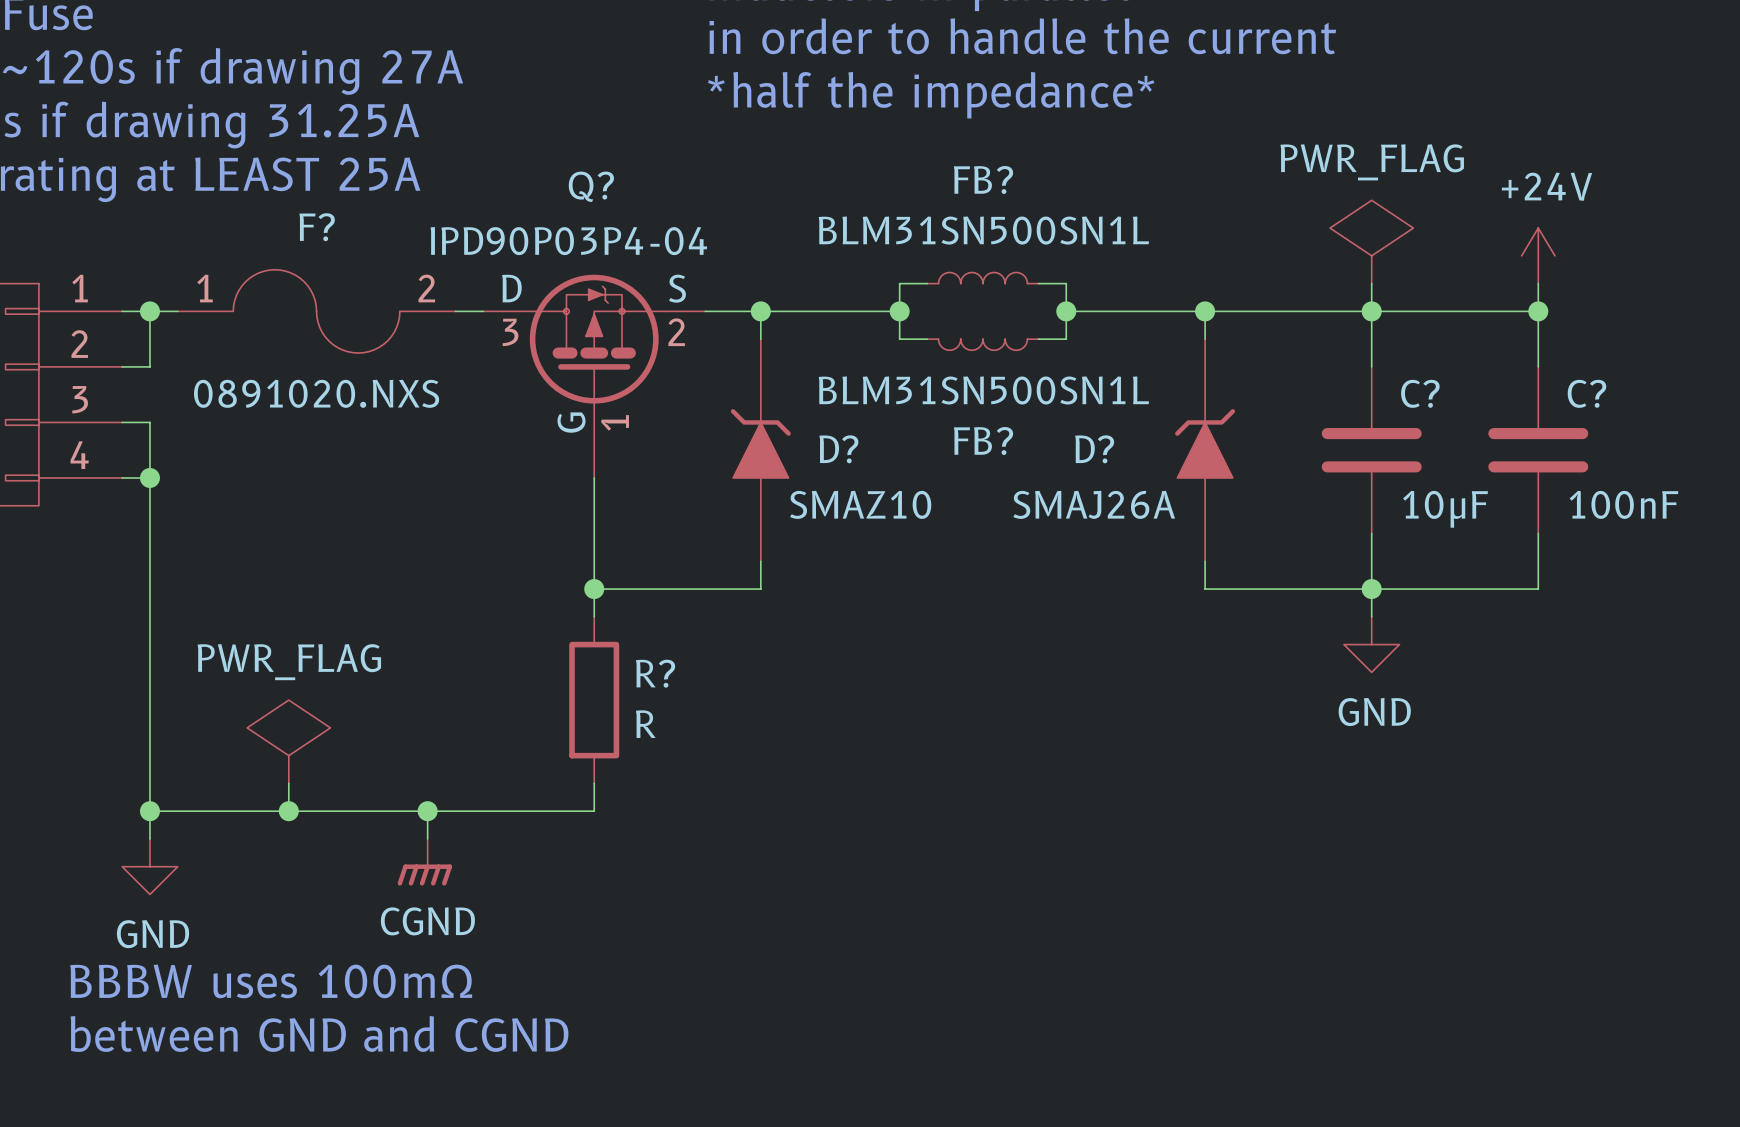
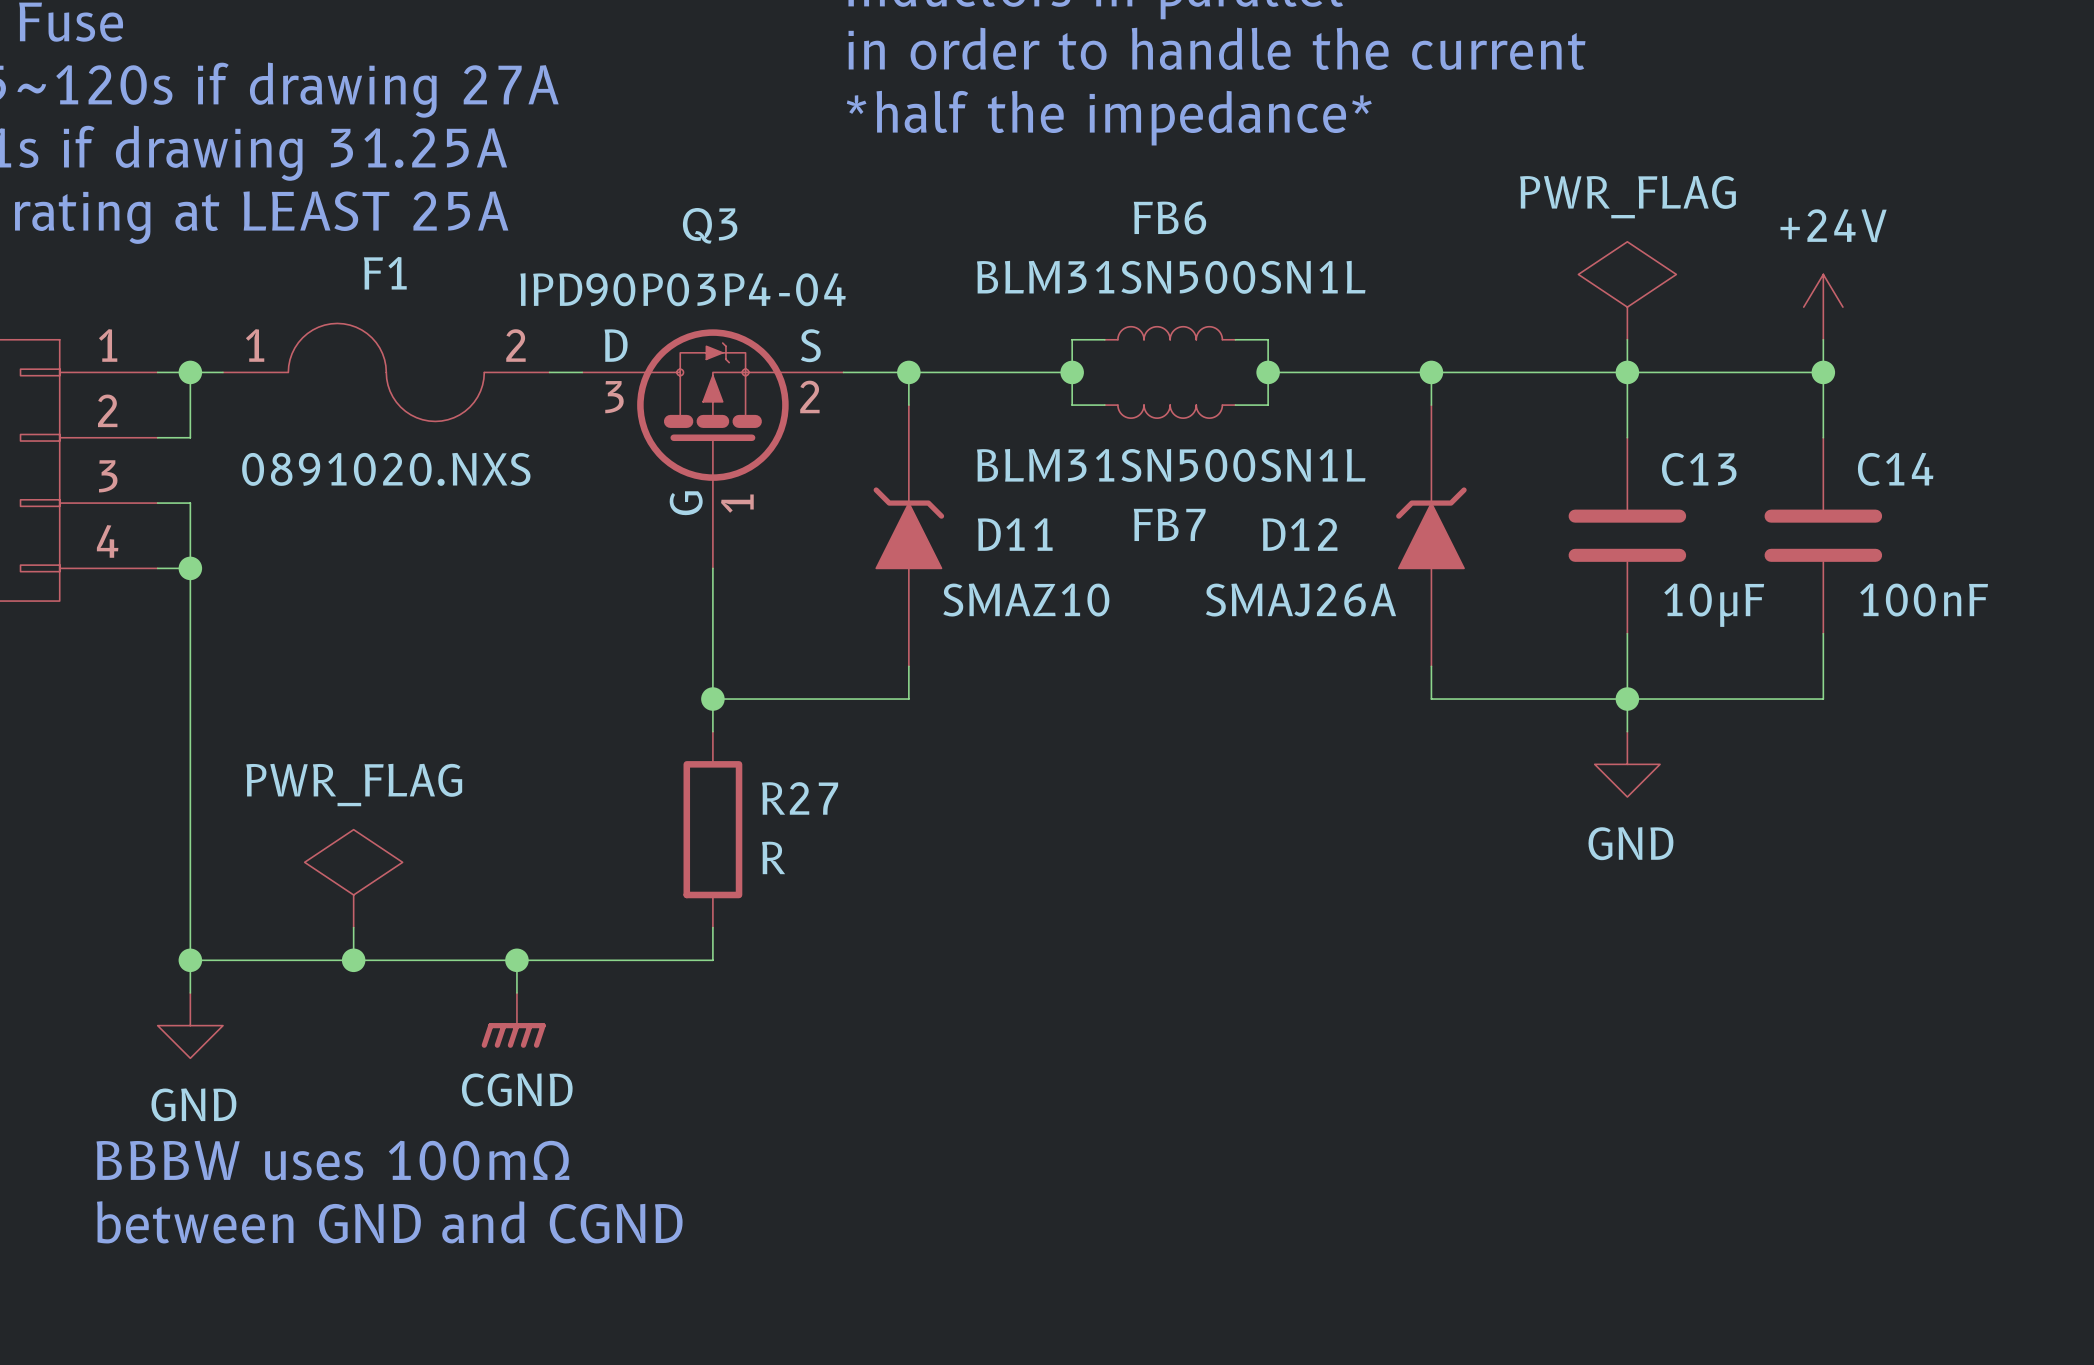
FB? name: FB? (983, 180) -> FB6 (1170, 217)
Q? name: Q? (591, 186) -> Q3 (710, 225)
F? name: F? (317, 227) -> F1 (385, 273)
C? name: C? (1420, 393) -> C13 (1699, 469)
C? name: C? (1586, 393) -> C14 (1895, 469)
FB? name: FB? (983, 441) -> FB7 (1169, 524)
D? name: D? (838, 449) -> D11 (1015, 534)
D? name: D? (1094, 449) -> D12 (1299, 534)
R? name: R? (655, 673) -> R27 (800, 798)

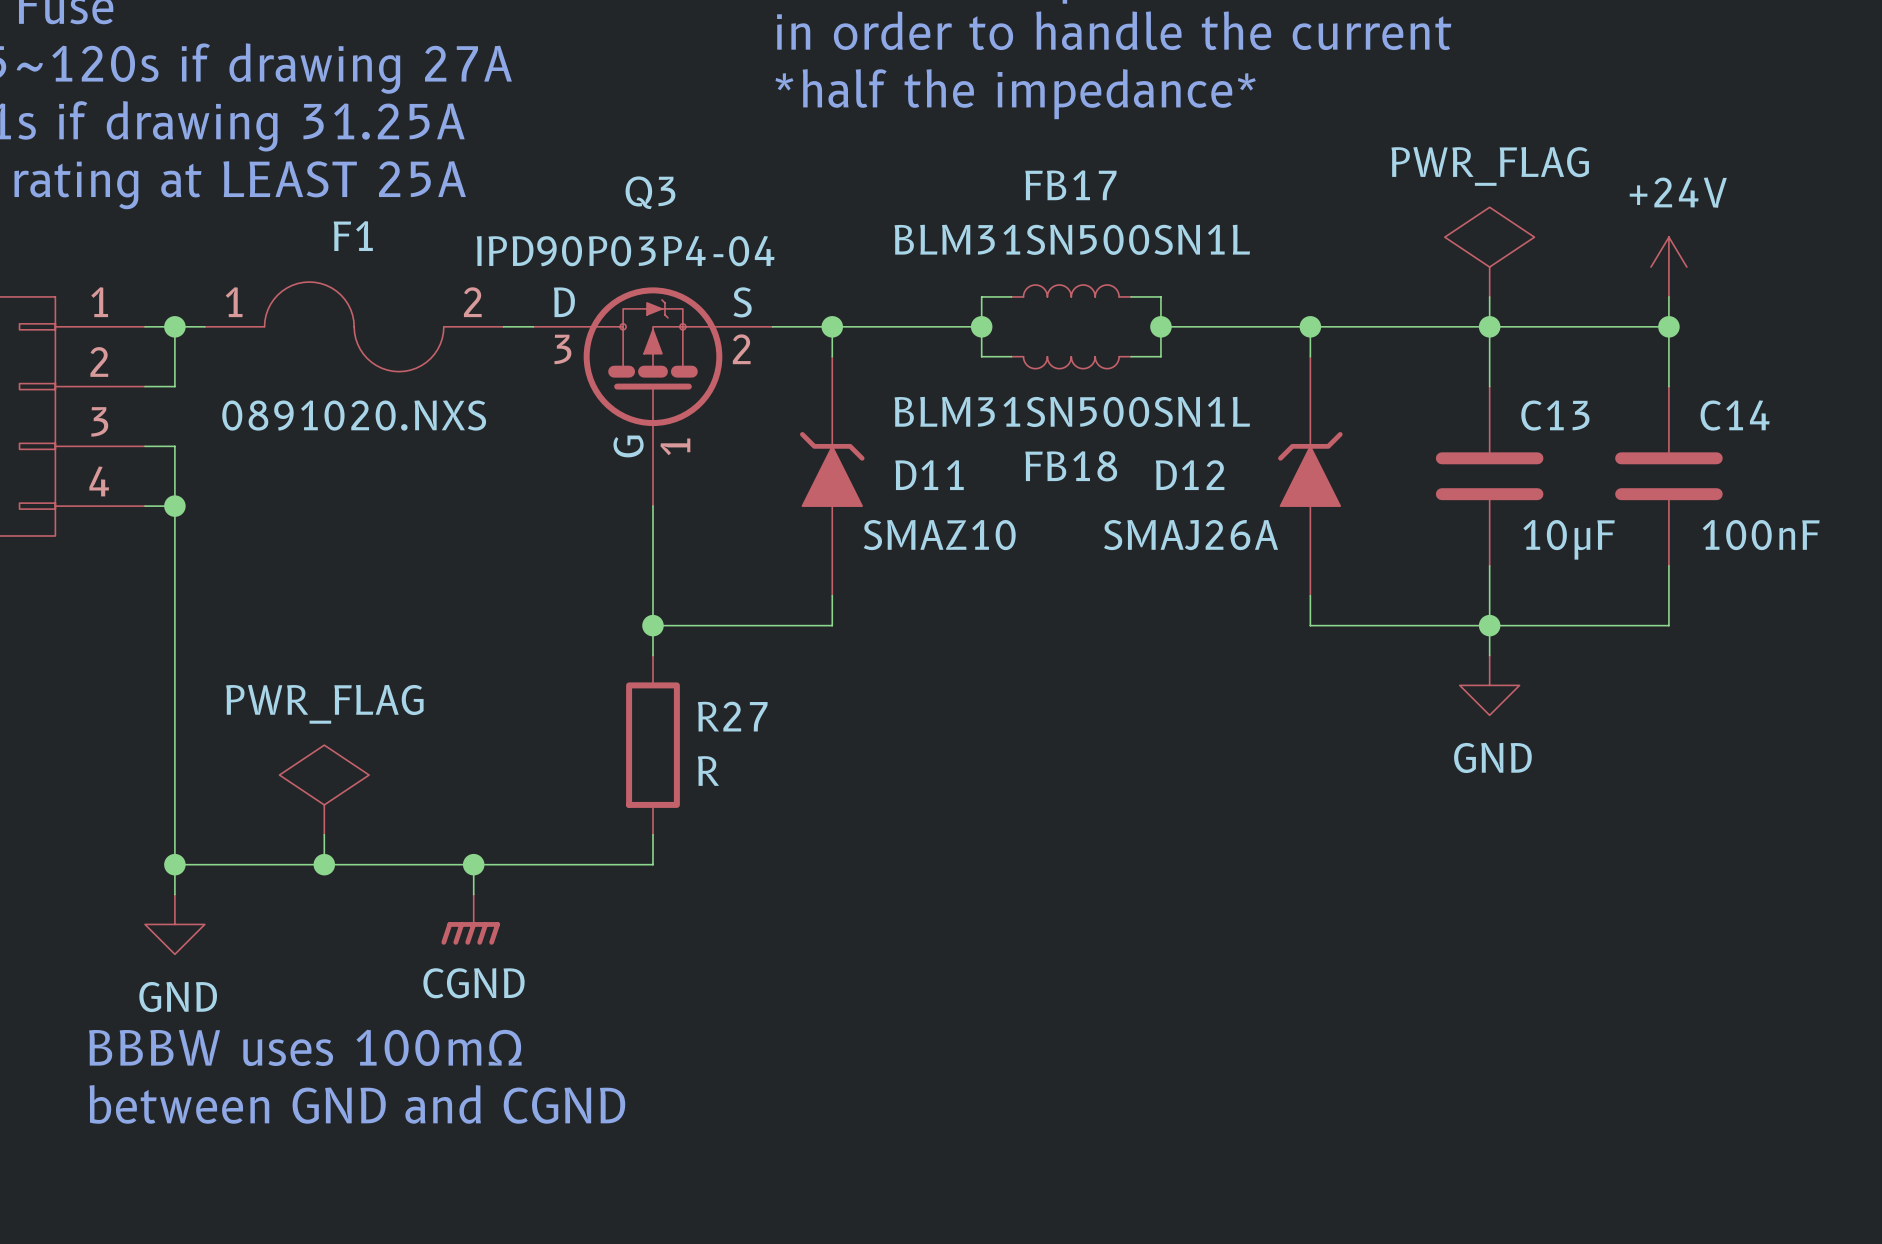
FB6 name: FB6 (1170, 217) -> FB17 (1070, 185)
FB7 name: FB7 (1169, 524) -> FB18 (1071, 466)

